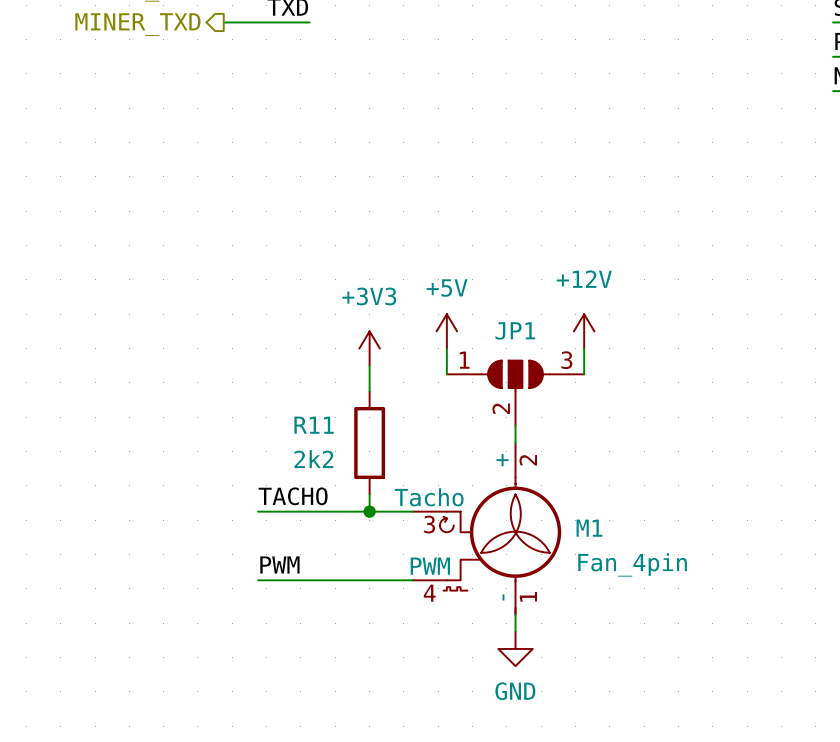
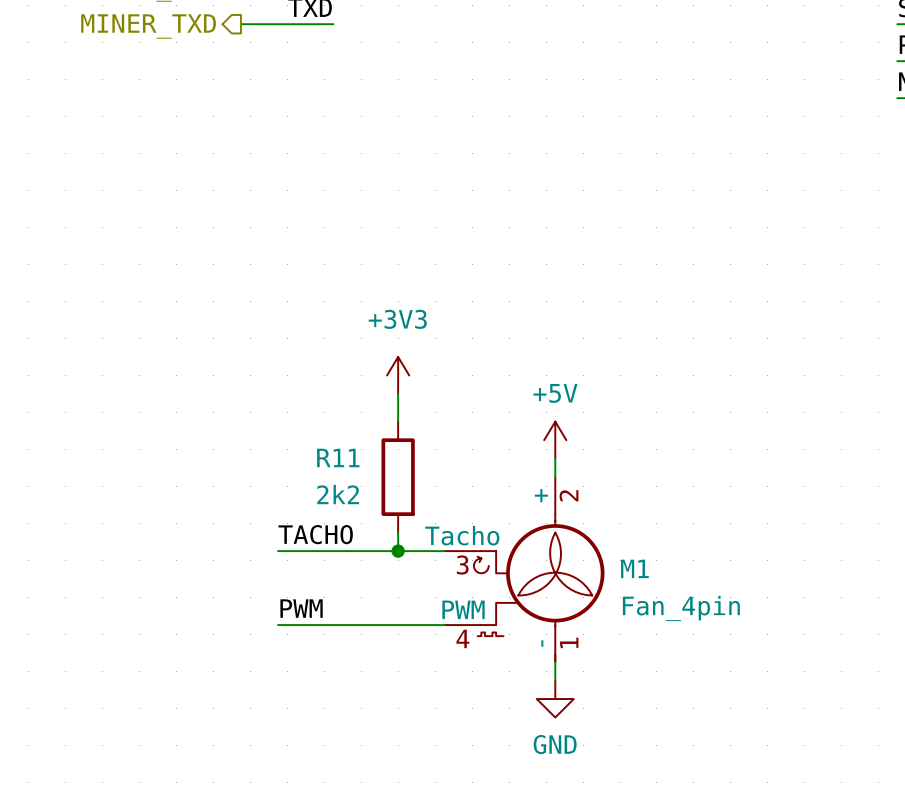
power symbol position: +5V (446, 331) -> +5V (555, 440)
power symbol: +12V (584, 331) -> none
wire: (446, 348) (446, 374) -> none
wire: (584, 348) (584, 374) -> none
JP1: (515, 393) -> none

